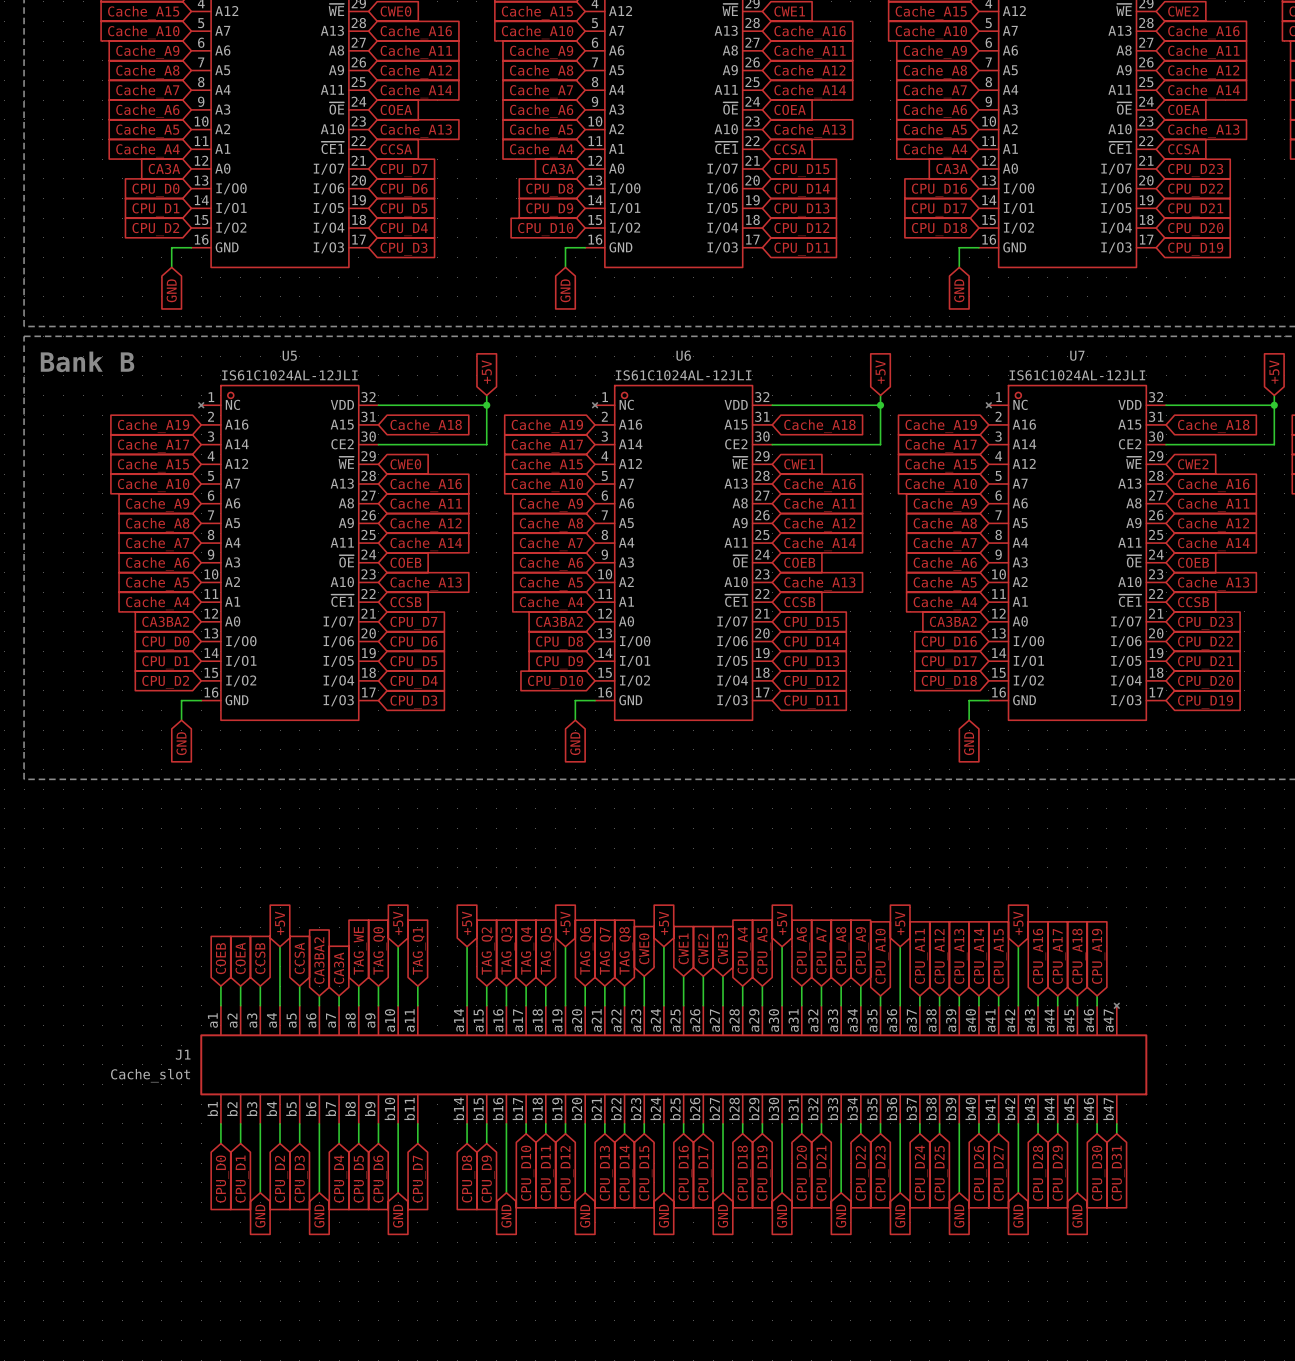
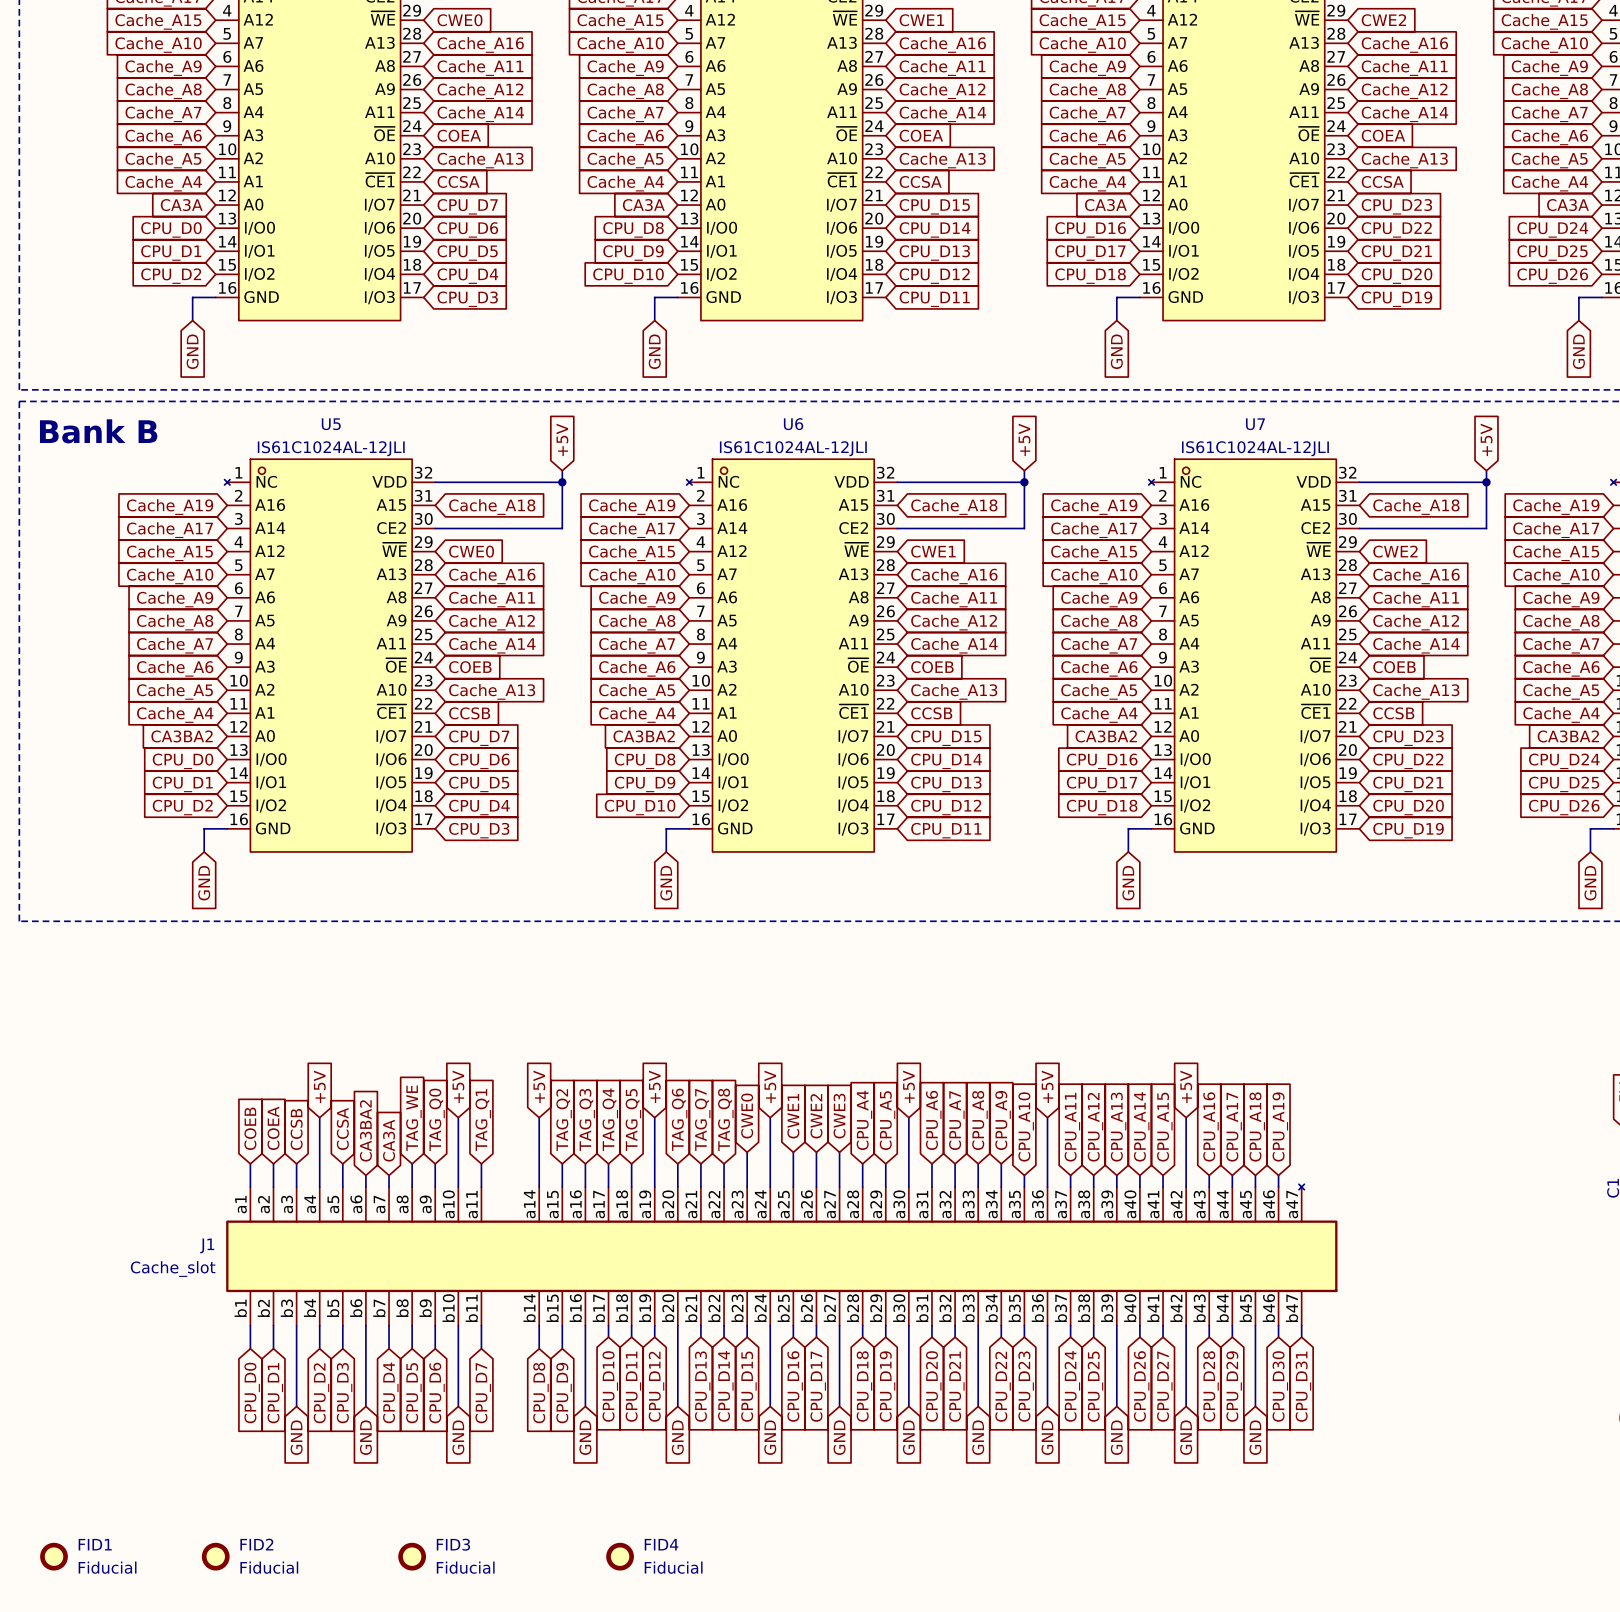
FID1: none -> Fiducial (54, 1556)
FID2: none -> Fiducial (215, 1556)
FID3: none -> Fiducial (412, 1556)
FID4: none -> Fiducial (620, 1556)

